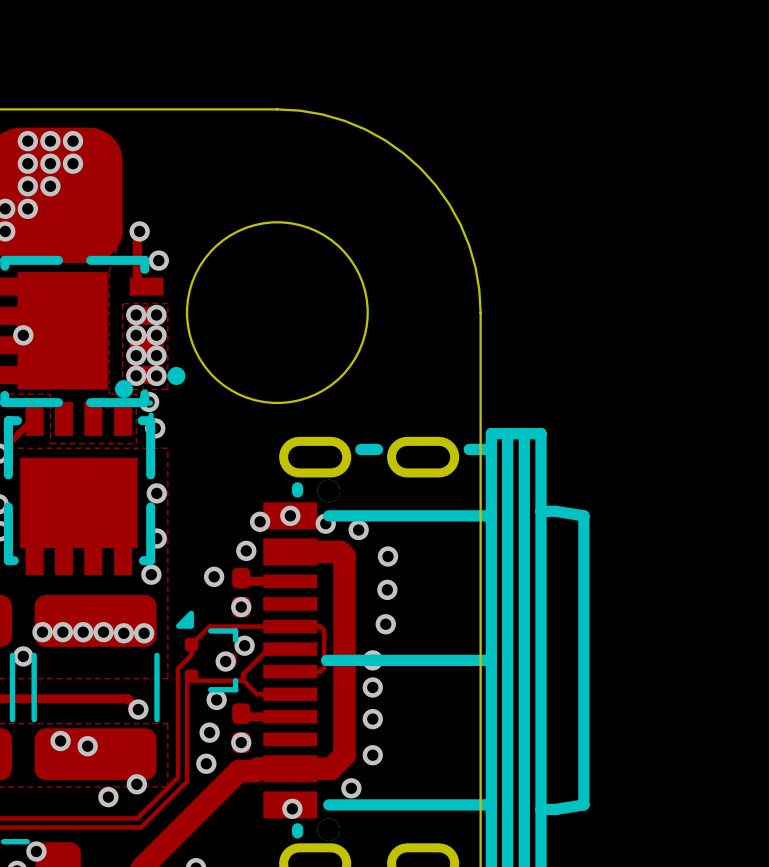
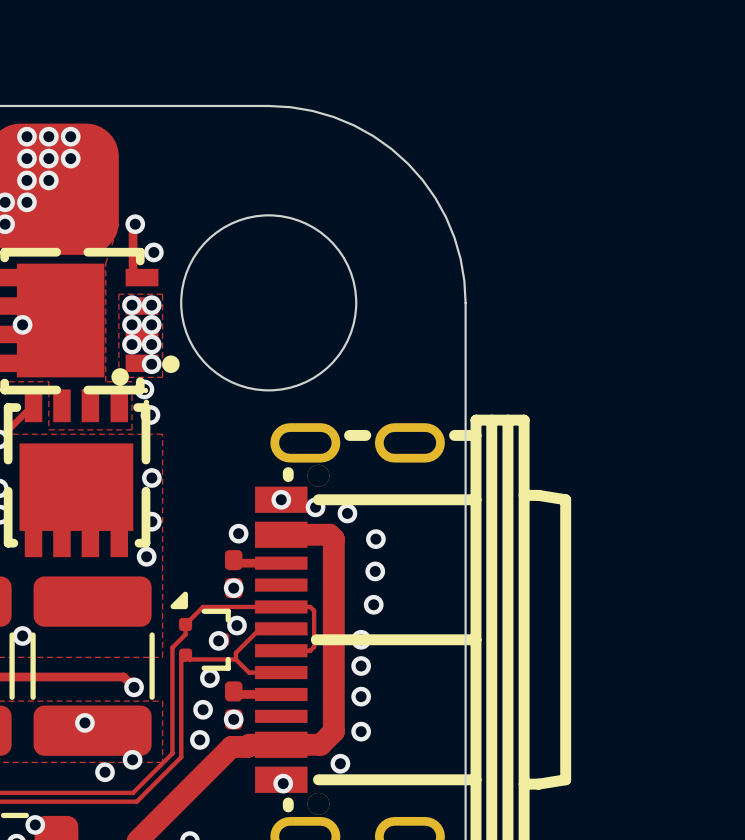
via: (136, 375) -> none
via: (260, 521) -> none
via: (214, 576) -> none
via: (42, 632) -> none
via: (62, 632) -> none
via: (83, 632) -> none
via: (103, 632) -> none
via: (123, 633) -> none
via: (144, 633) -> none
via: (60, 741) -> none

